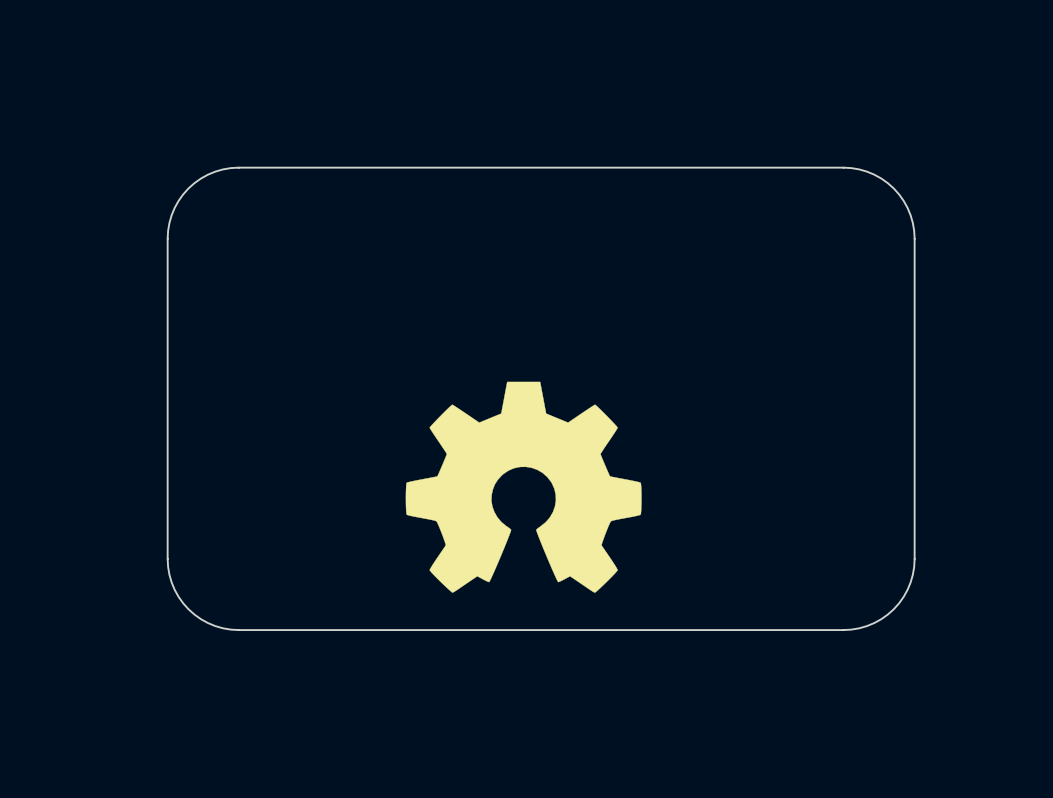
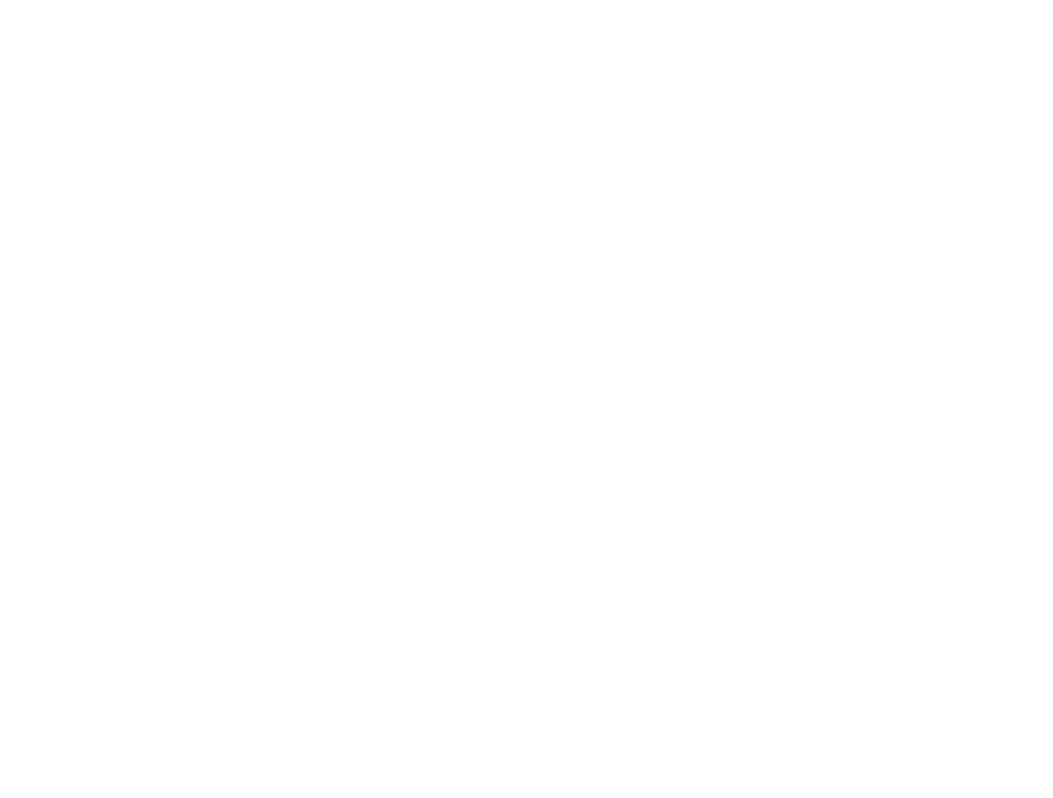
board edge: (238, 167) (843, 167) (859, 169) (881, 178) (893, 188) (903, 200) (910, 215) (914, 238) (914, 558) (910, 582) (903, 596) (893, 609) (874, 623) (859, 628) (843, 630) (238, 630) (215, 626) (200, 619) (188, 609) (178, 596) (171, 582) (168, 566) (168, 230) (174, 207) (188, 188) (207, 174) (222, 169) (238, 167) -> none
drawing: [405, 381, 642, 593] -> none

